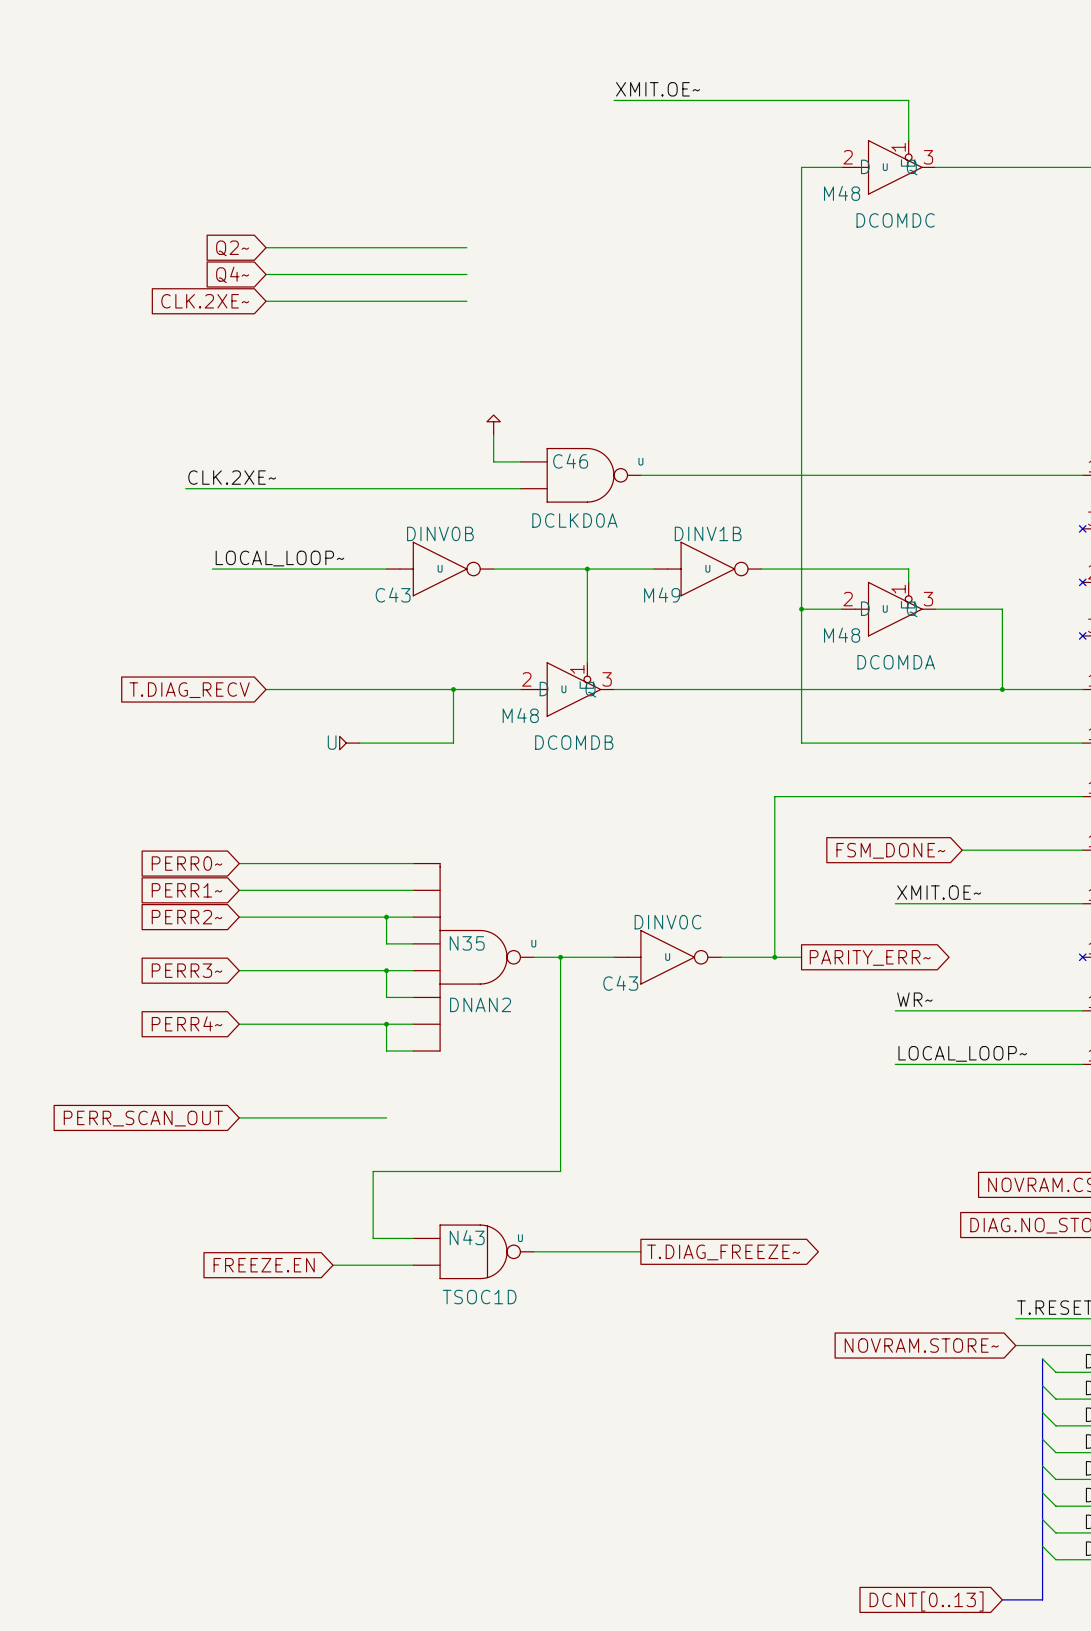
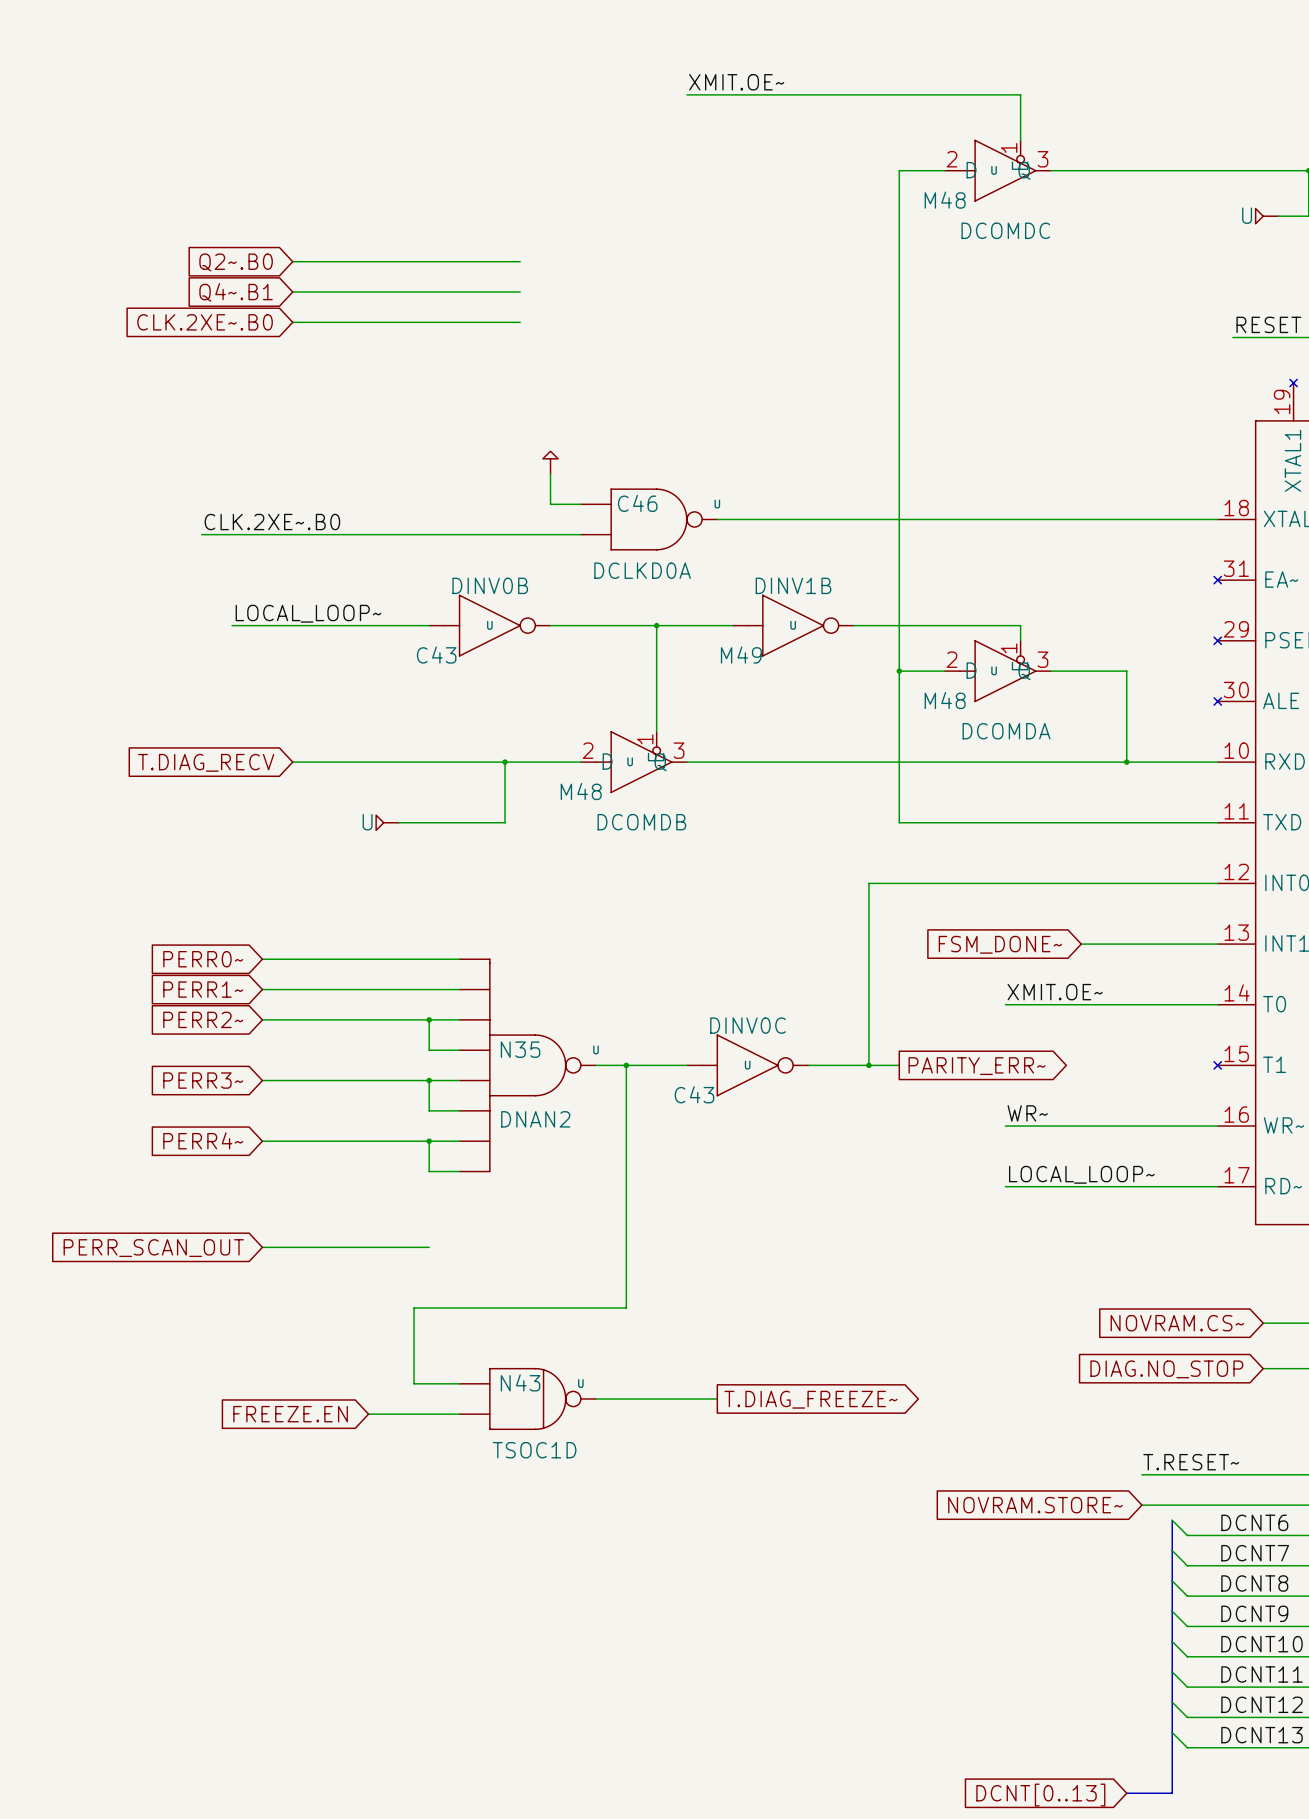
global label: Q2~ (232, 248) -> Q2~.B0 (236, 262)
global label: Q4~ (232, 274) -> Q4~.B1 (236, 292)
global label: CLK.2XE~ (205, 301) -> CLK.2XE~.B0 (205, 322)
label: CLK.2XE~ (232, 477) -> CLK.2XE~.B0 (272, 522)

